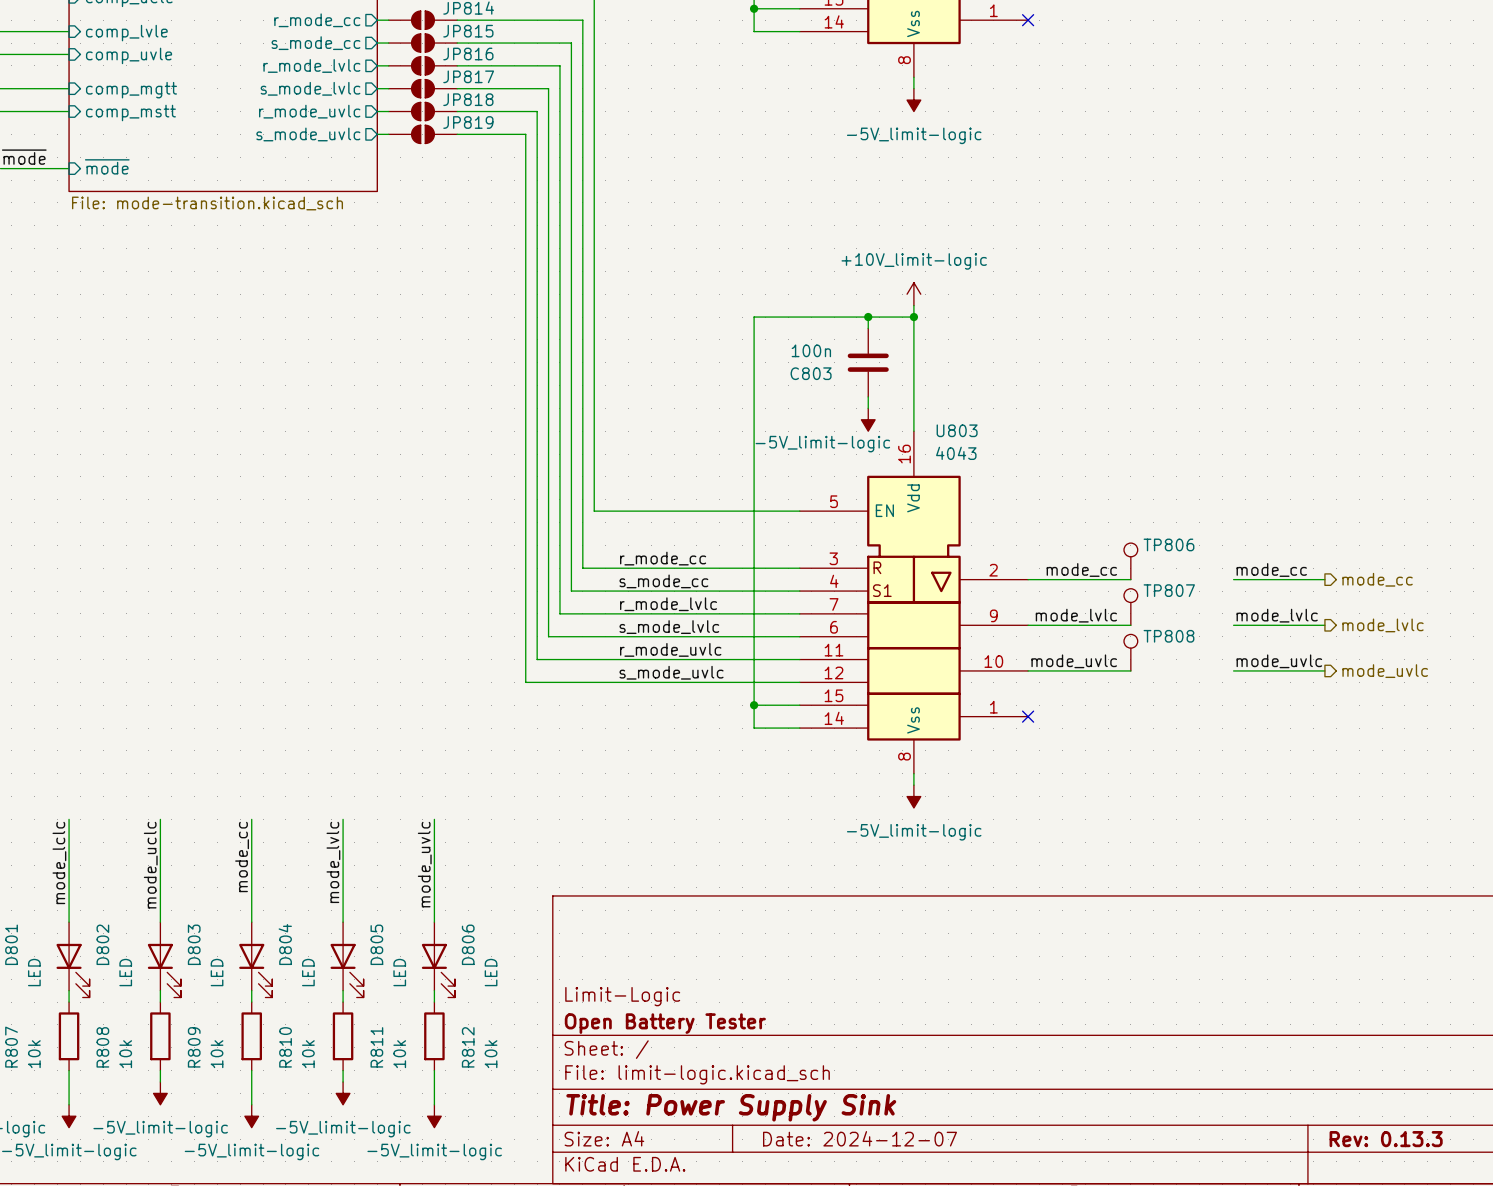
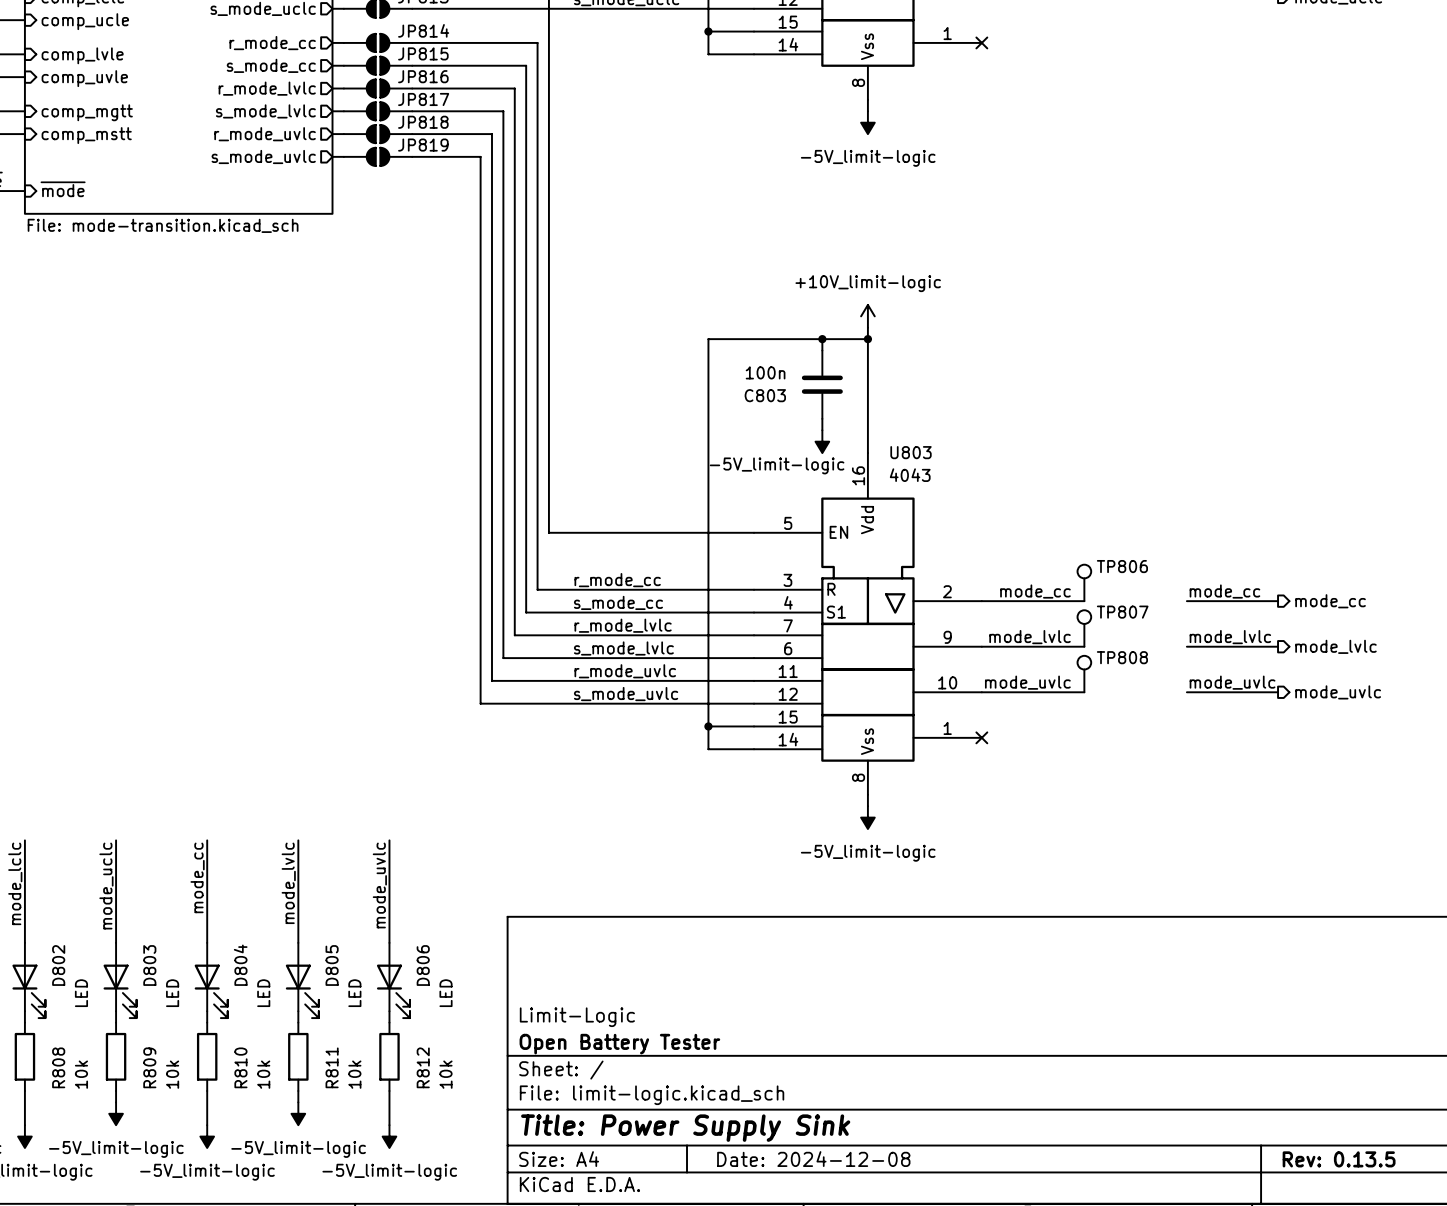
title block: Date: 2024-12-07 (860, 1138) -> Date: 2024-12-08 (813, 1159)
title block: Rev: 0.13.3 (1386, 1139) -> Rev: 0.13.5 (1339, 1159)

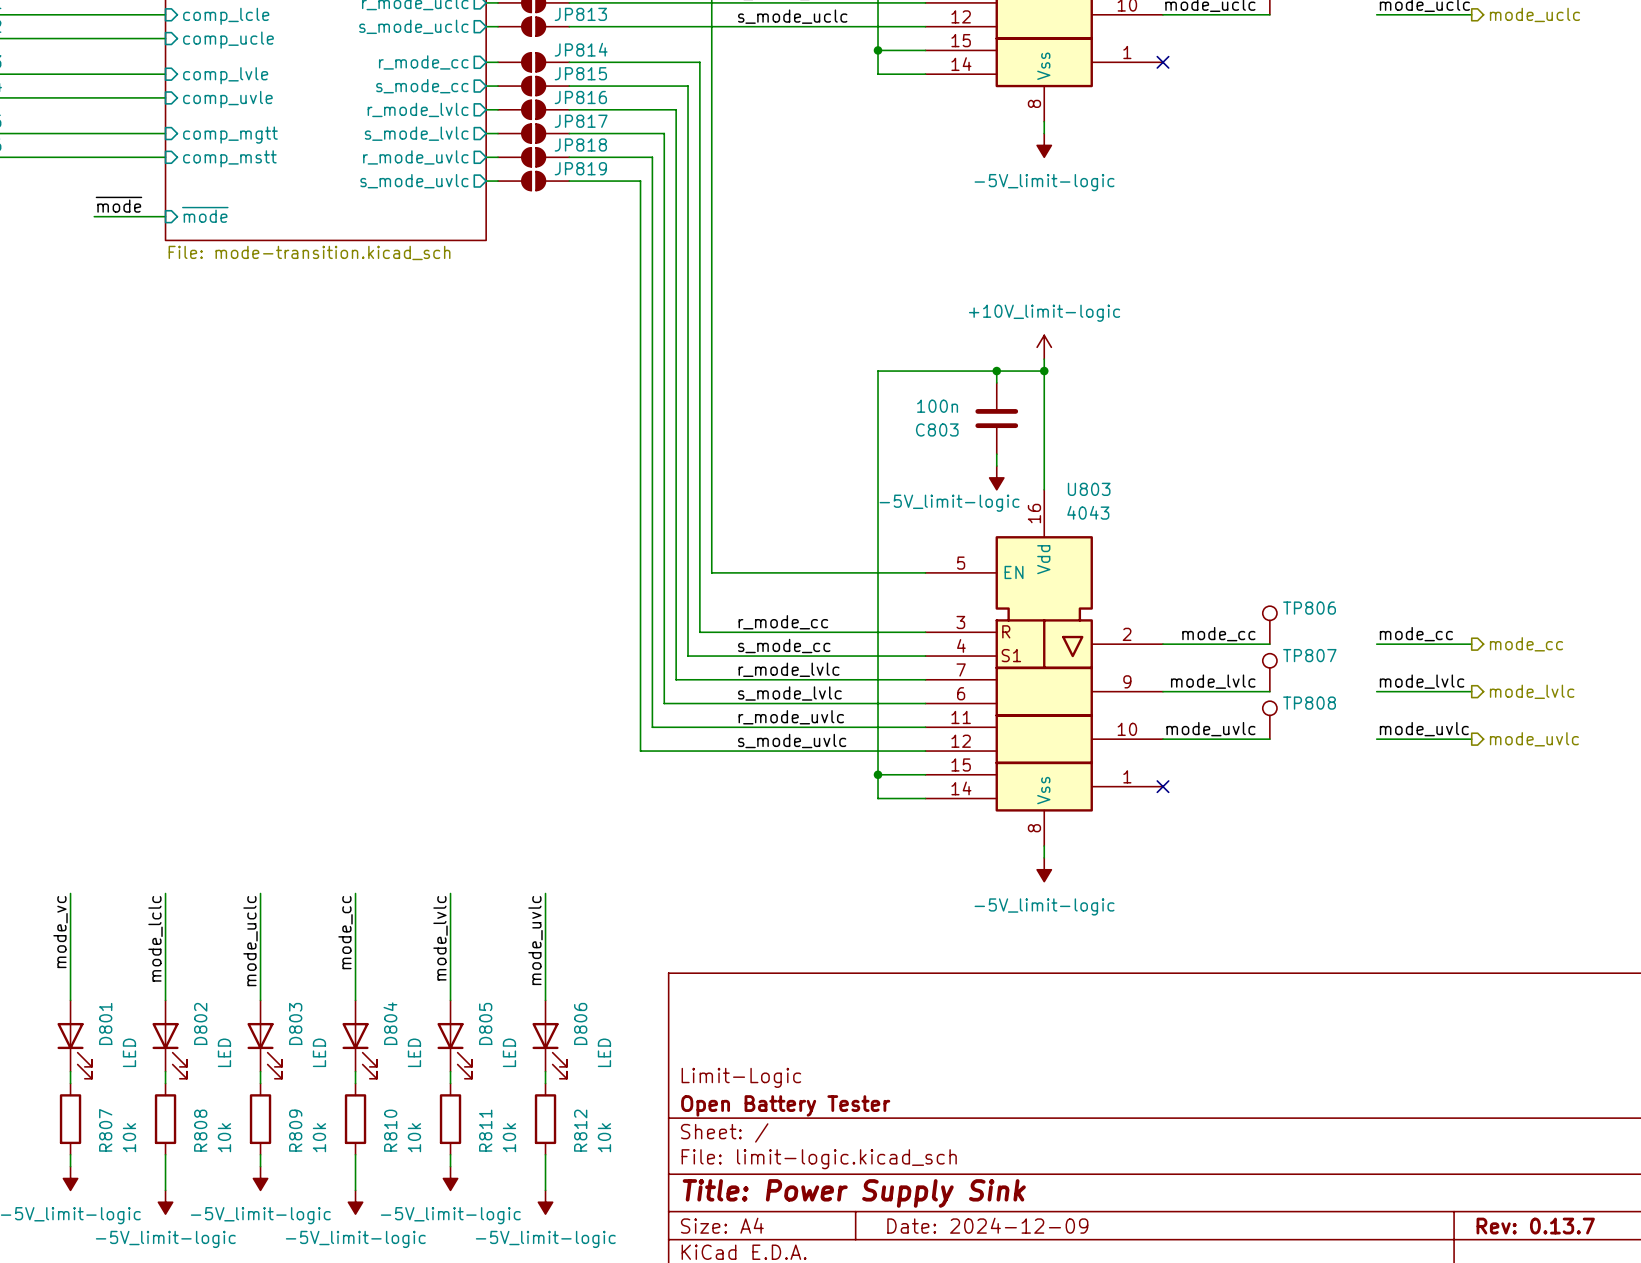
title block: Date: 2024-12-08 (813, 1159) -> Date: 2024-12-09 (987, 1225)
title block: Rev: 0.13.5 (1339, 1159) -> Rev: 0.13.7 (1535, 1226)

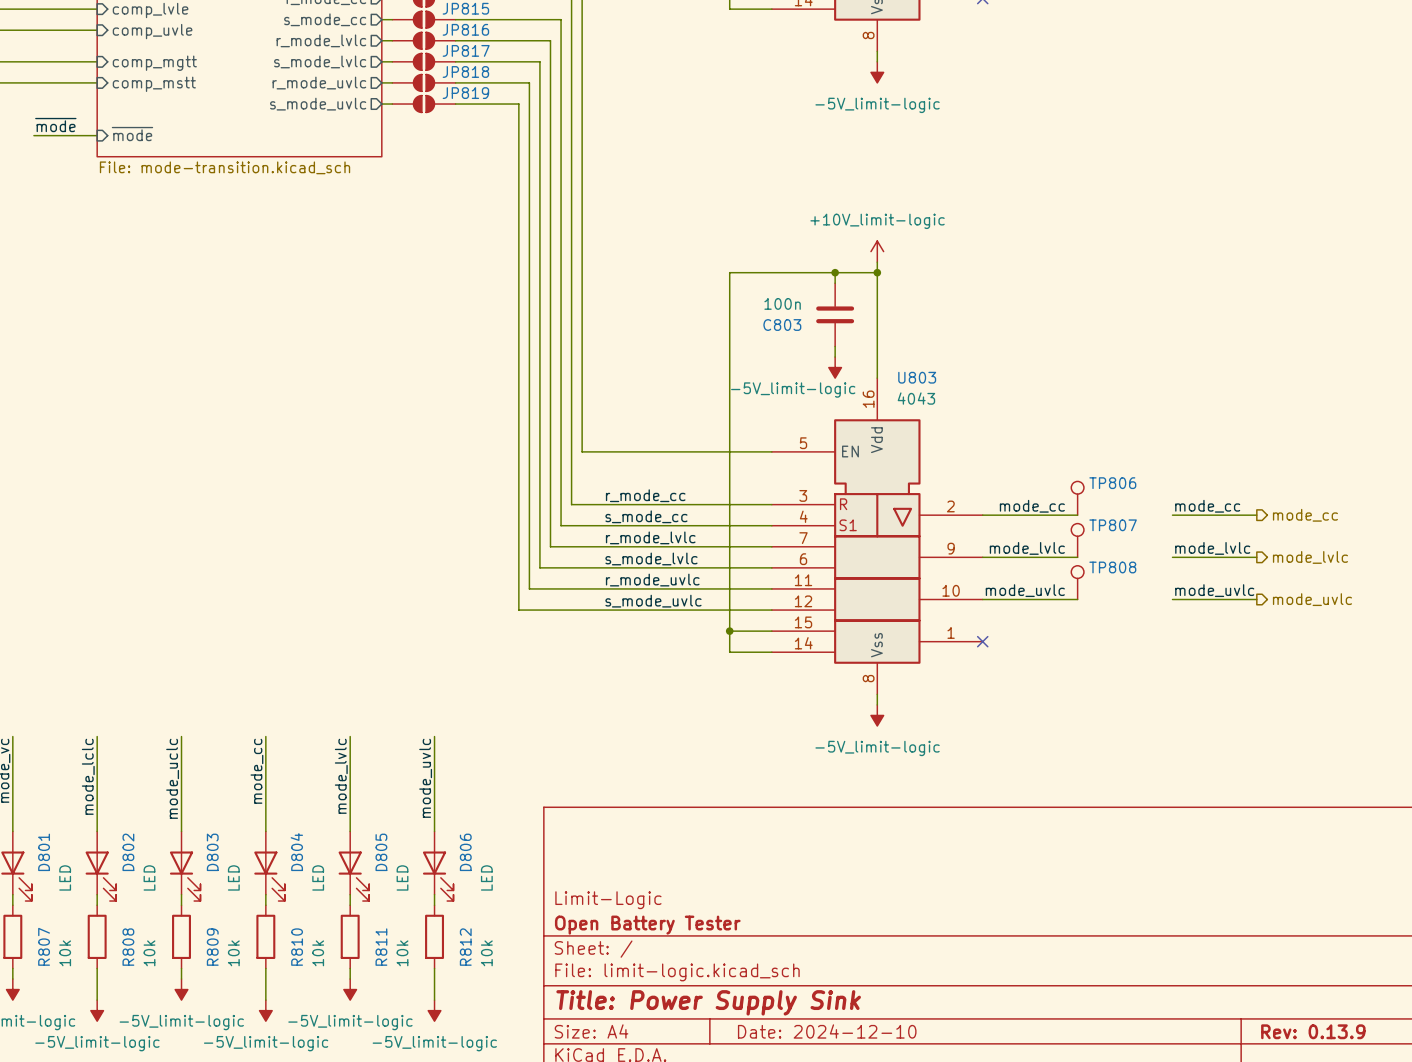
title block: Date: 2024-12-09 (987, 1225) -> Date: 2024-12-10 (827, 1031)
title block: Rev: 0.13.7 (1535, 1226) -> Rev: 0.13.9 (1313, 1031)

